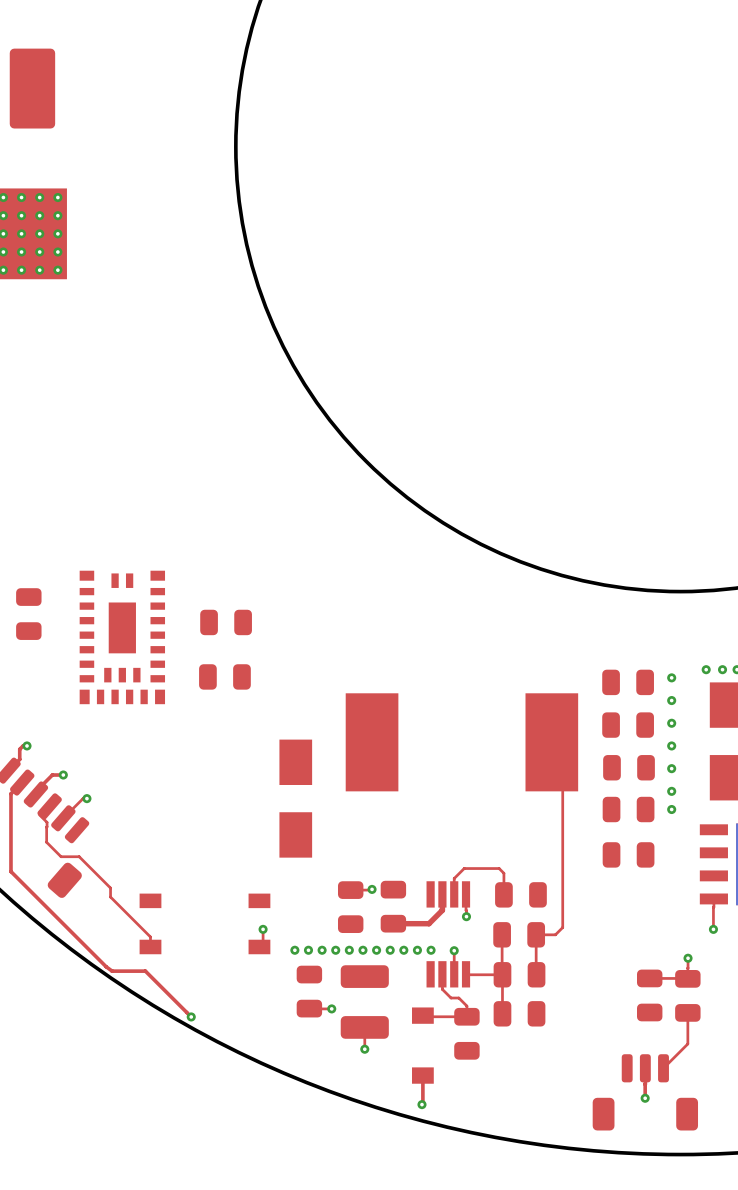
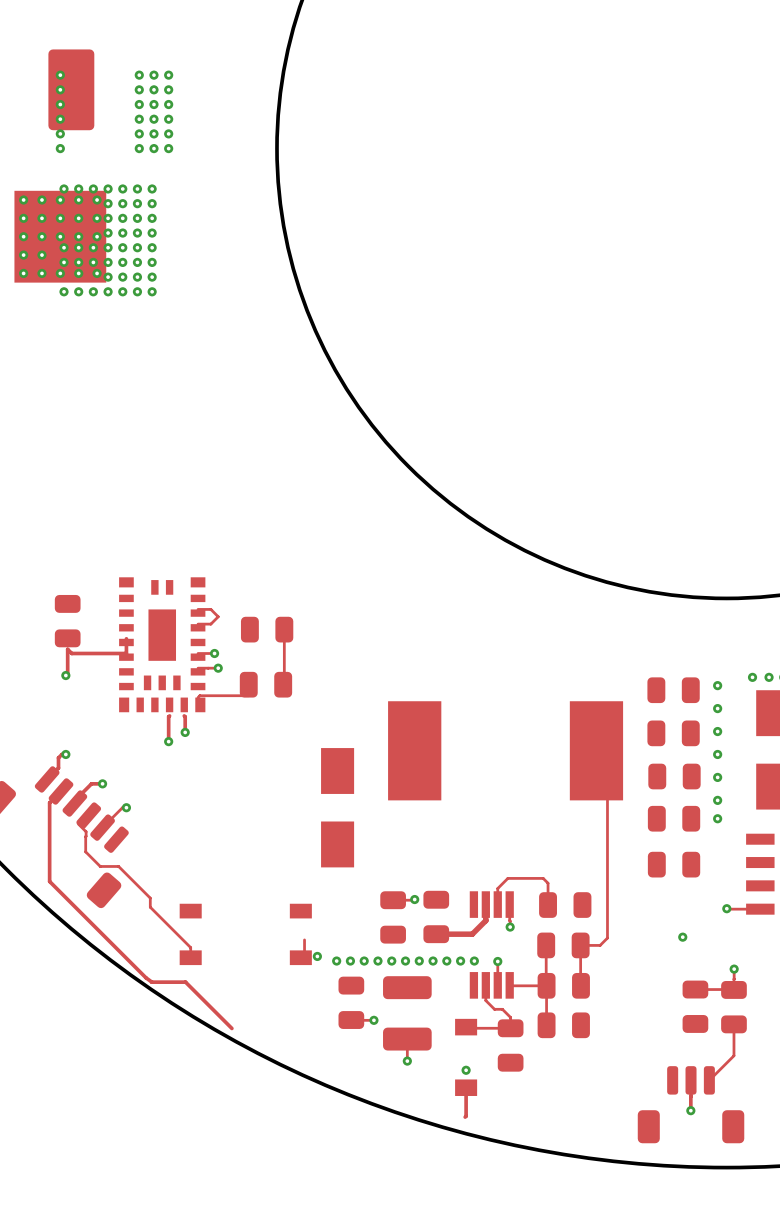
via: none -> (60, 75)
via: none -> (139, 75)
via: none -> (153, 75)
via: none -> (168, 75)
via: none -> (60, 89)
via: none -> (139, 89)
via: none -> (153, 89)
via: none -> (168, 89)
via: none -> (60, 104)
via: none -> (139, 104)
via: none -> (153, 104)
via: none -> (168, 104)
via: none -> (60, 119)
via: none -> (139, 119)
via: none -> (153, 119)
via: none -> (168, 119)
via: none -> (60, 133)
via: none -> (139, 133)
via: none -> (153, 133)
via: none -> (168, 133)
via: none -> (60, 148)
via: none -> (139, 148)
via: none -> (153, 148)
via: none -> (168, 148)
via: none -> (64, 188)
via: none -> (78, 188)
via: none -> (93, 188)
via: none -> (108, 188)
via: none -> (122, 188)
via: none -> (137, 188)
via: none -> (152, 188)
via: none -> (108, 203)
via: none -> (122, 203)
via: none -> (137, 203)
via: none -> (152, 203)
via: none -> (108, 218)
via: none -> (122, 218)
via: none -> (137, 218)
via: none -> (152, 218)
via: none -> (108, 233)
via: none -> (122, 233)
via: none -> (137, 233)
via: none -> (152, 233)
via: none -> (64, 247)
via: none -> (78, 247)
via: none -> (93, 247)
via: none -> (108, 247)
via: none -> (122, 247)
via: none -> (137, 247)
via: none -> (152, 247)
via: (21, 252) -> none
via: (39, 252) -> none
via: (57, 252) -> none
via: none -> (64, 262)
via: none -> (78, 262)
via: none -> (93, 262)
via: none -> (108, 262)
via: none -> (122, 262)
via: none -> (137, 262)
via: none -> (152, 262)
via: none -> (108, 277)
via: none -> (122, 277)
via: none -> (137, 277)
via: none -> (152, 277)
via: none -> (64, 291)
via: none -> (78, 291)
via: none -> (93, 291)
via: none -> (108, 291)
via: none -> (122, 291)
via: none -> (137, 291)
via: none -> (152, 291)
top track: none -> (198, 609) (210, 609) (218, 616) (210, 624) (198, 624)
top track: none -> (126, 638) (126, 653) (71, 653) (67, 649) (67, 673) (65, 675)
top track: none -> (284, 640) (283, 695)
top track: none -> (214, 653) (198, 653)
via: none -> (214, 653)
top track: none -> (218, 668) (198, 668)
via: none -> (218, 668)
via: none -> (65, 675)
top track: none -> (248, 695) (199, 695) (198, 697)
top track: none -> (169, 715) (168, 741)
top track: none -> (184, 715) (185, 732)
via: none -> (185, 732)
via: none -> (168, 741)
via: none -> (726, 908)
top track: (713, 898) (713, 929) -> (760, 909) (726, 908)
via: none -> (682, 937)
via position: (263, 929) -> (317, 956)
via: (713, 929) -> none
via: (191, 1016) -> none
via position: (421, 1104) -> (466, 1070)

